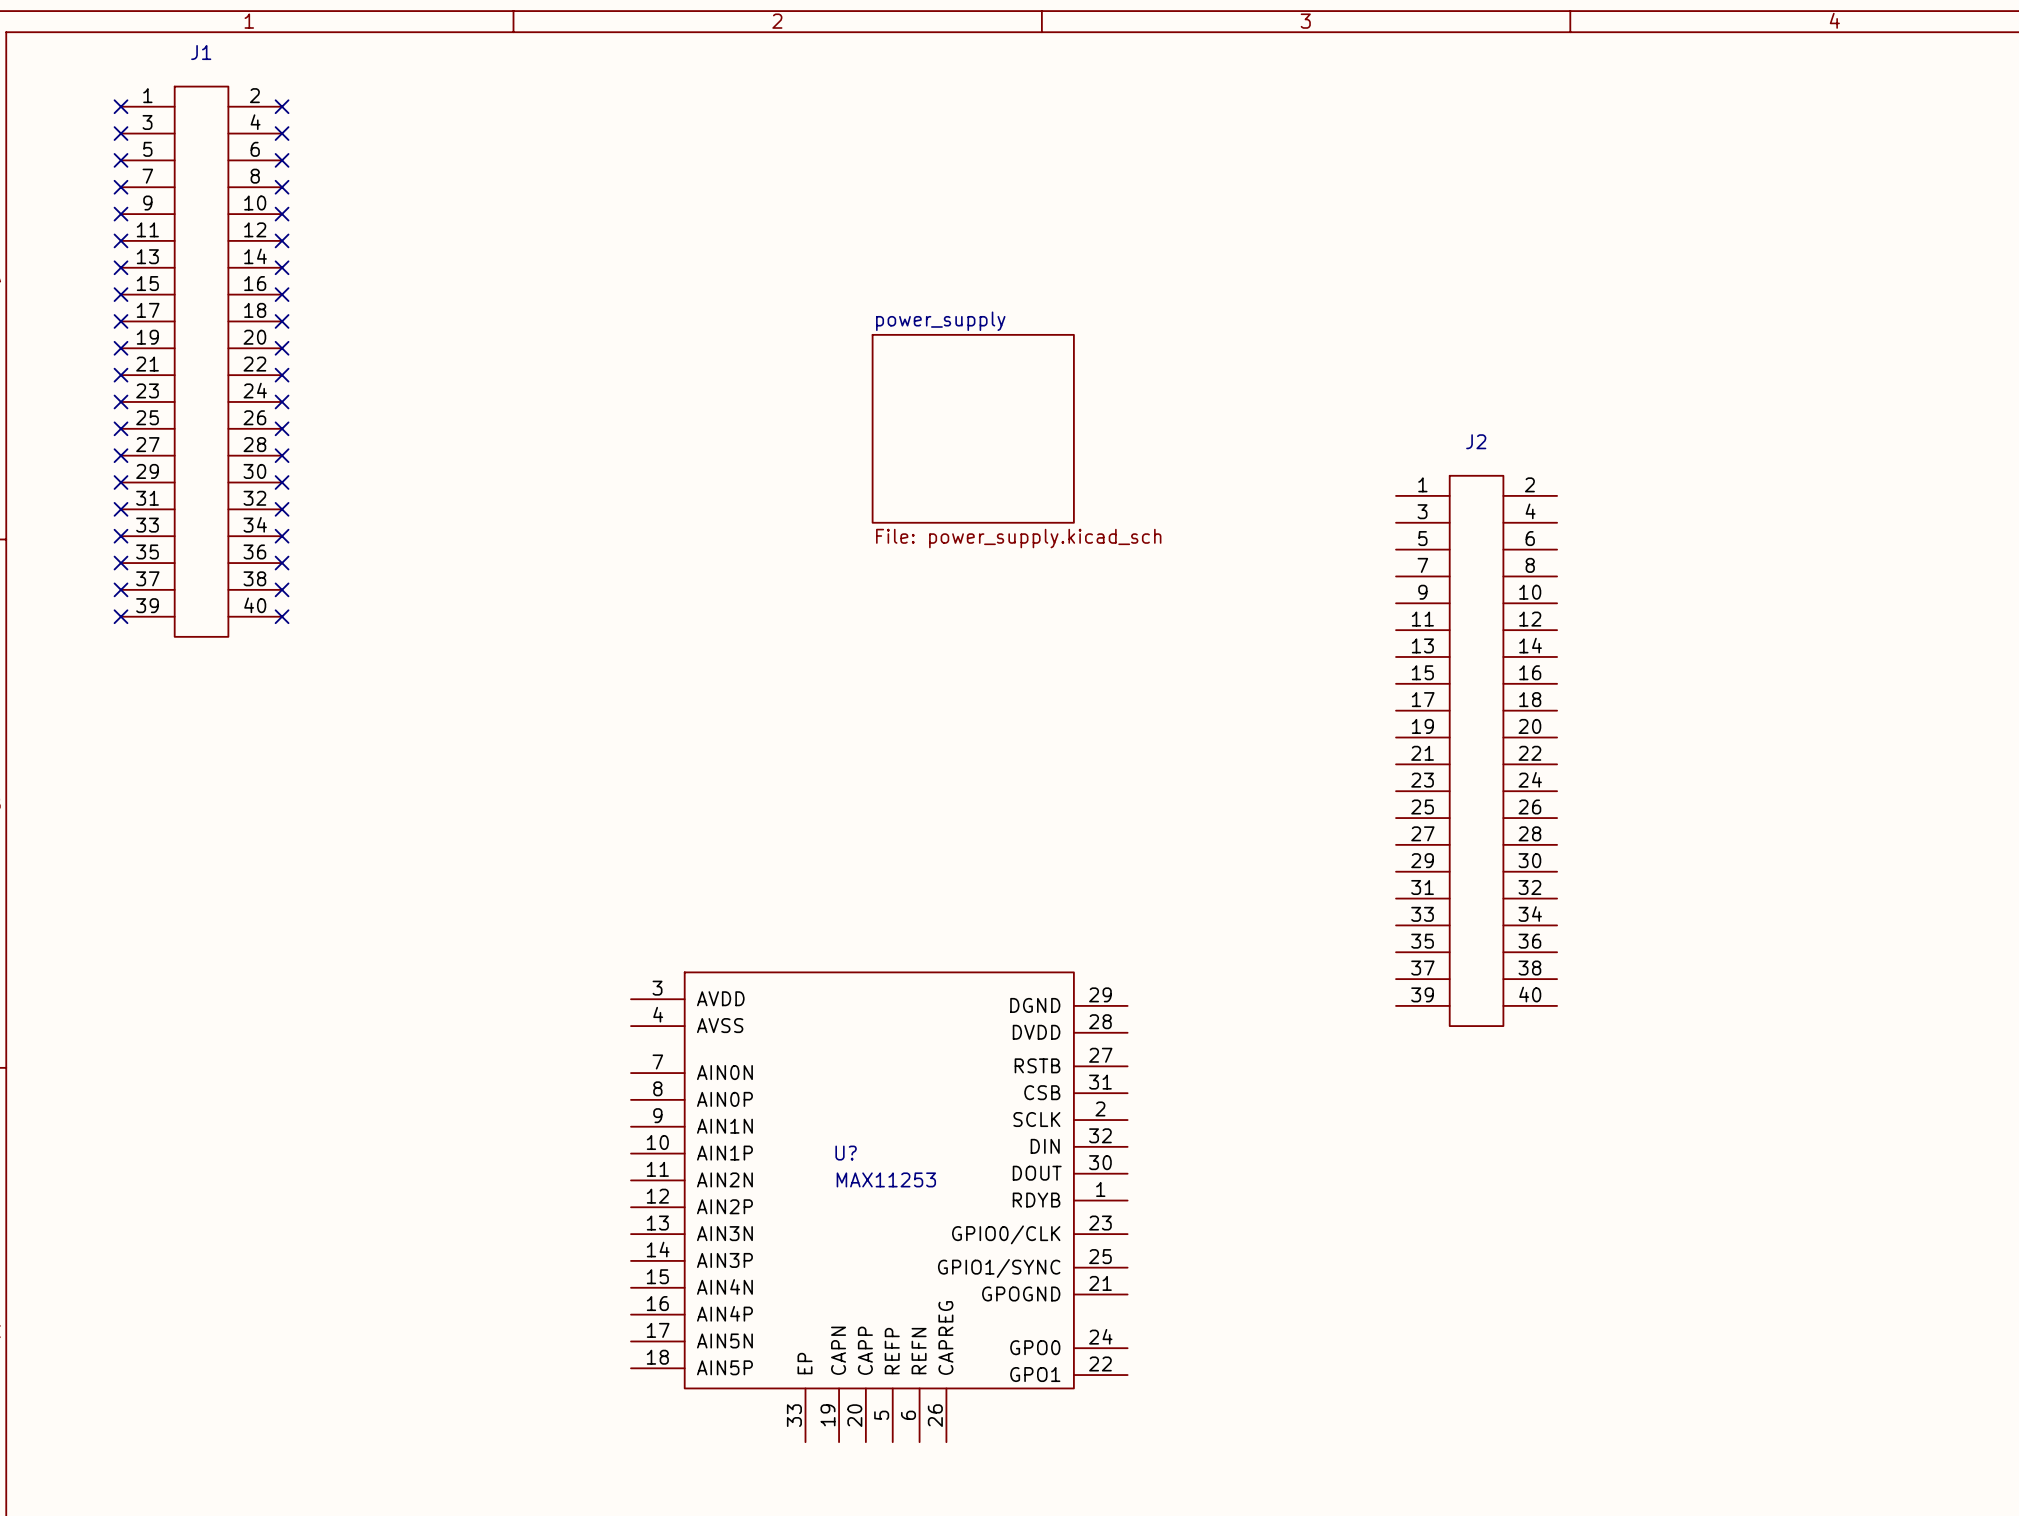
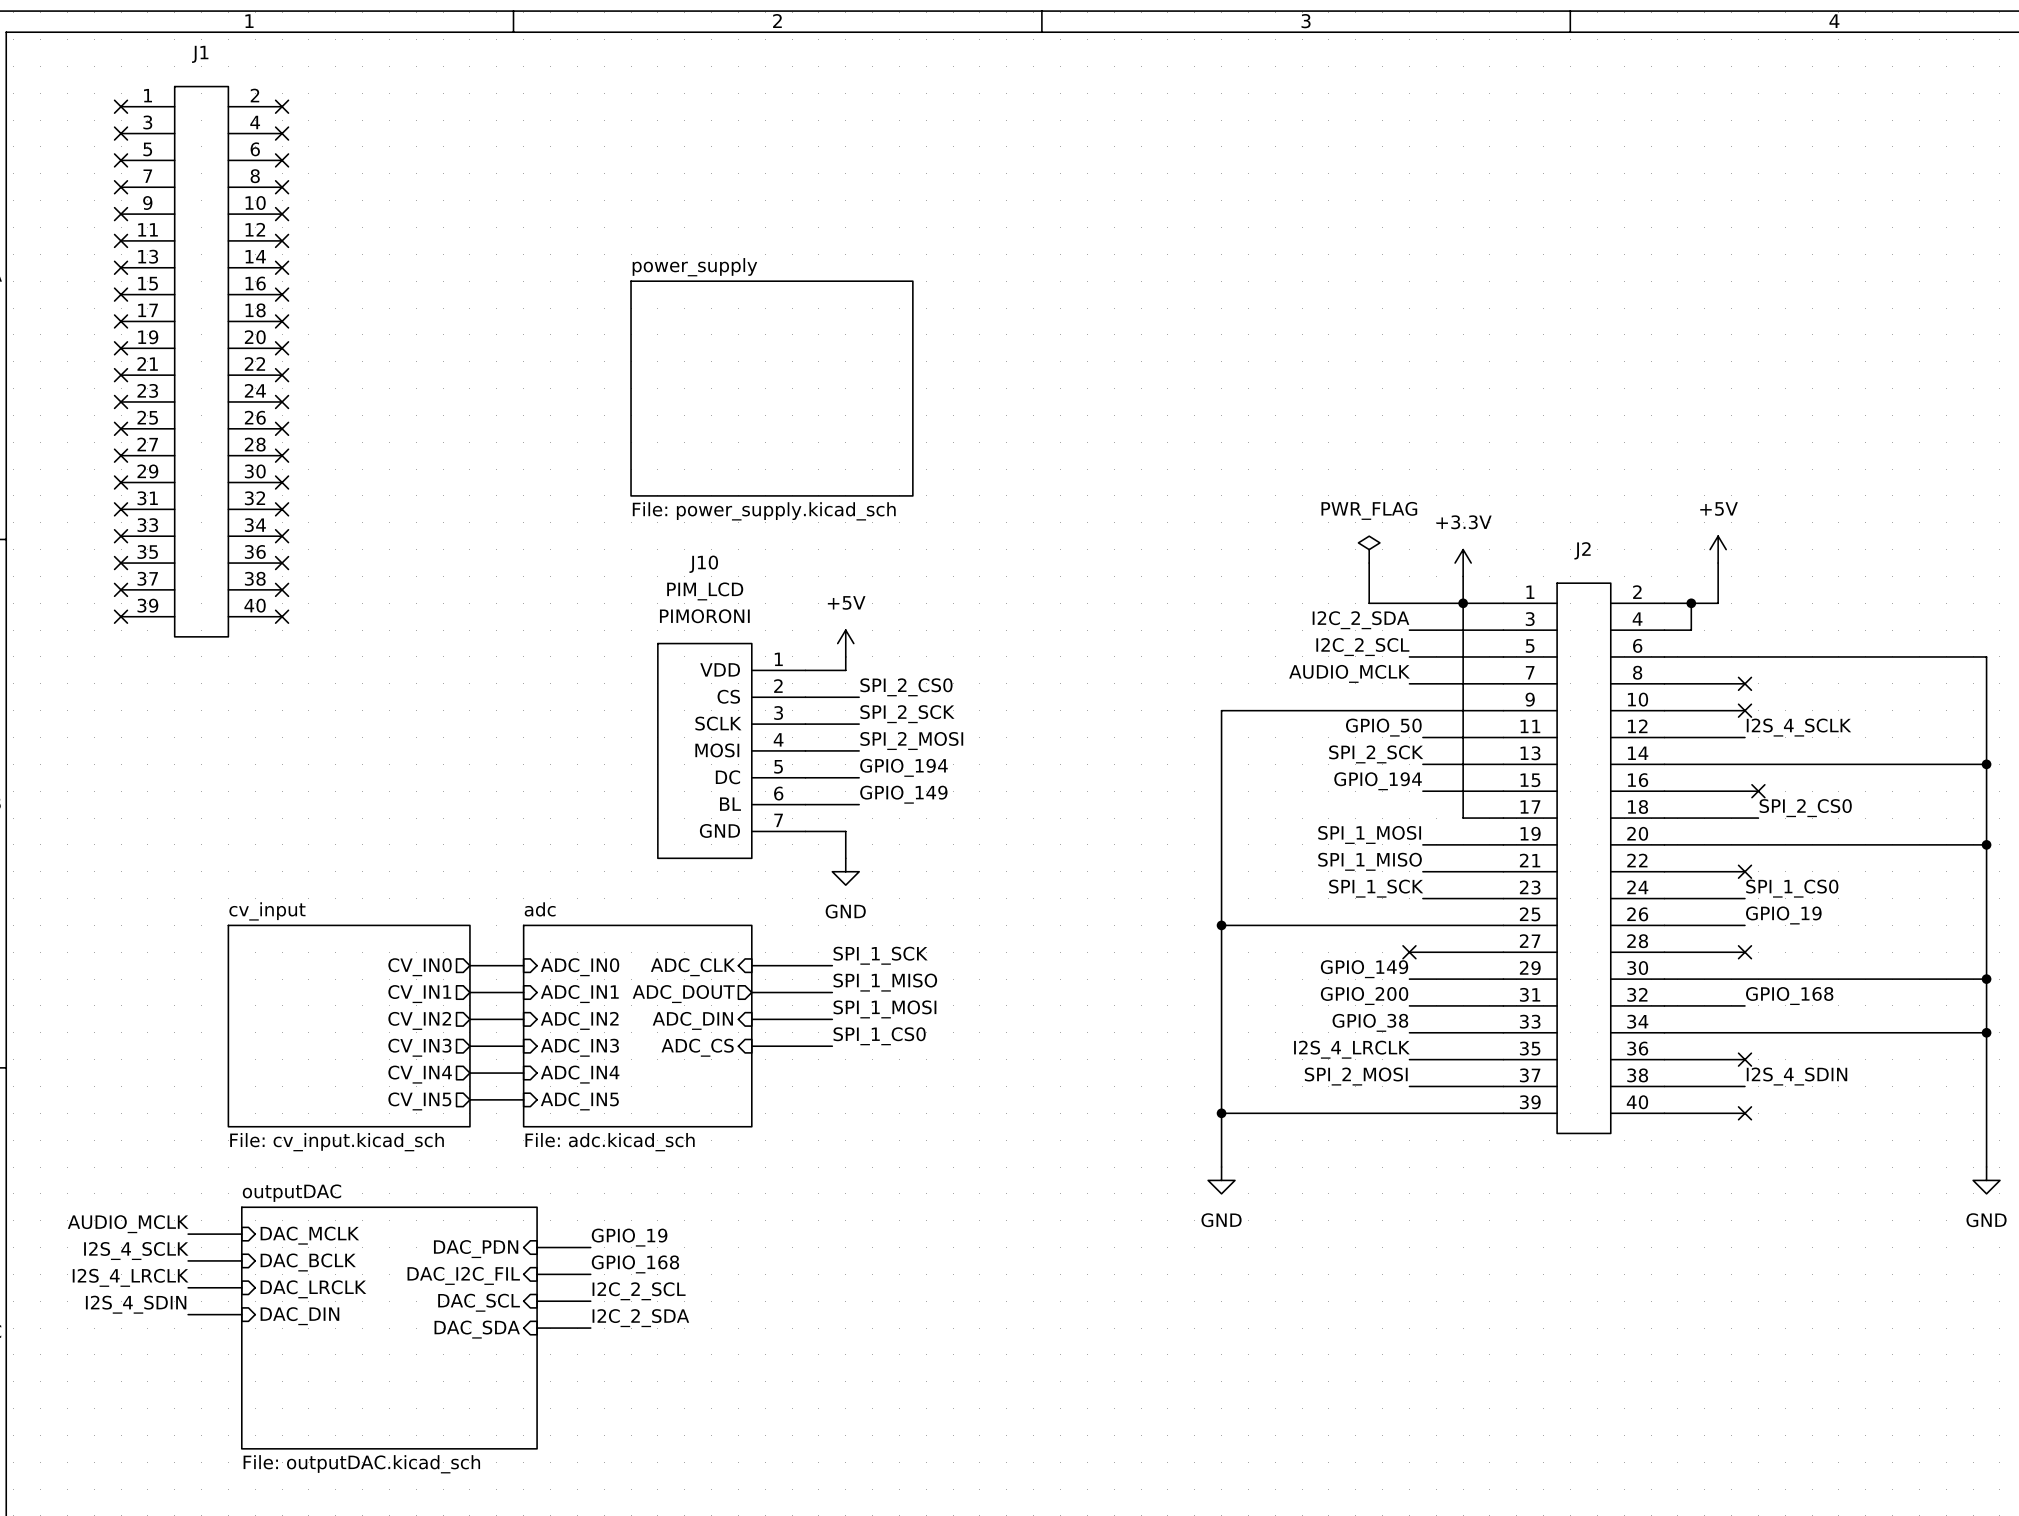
sheet power_supply: none -> File: power_supply.kicad_sch (771, 388)
sheet power_supply: File: power_supply.kicad_sch (973, 428) -> none
power symbol: none -> PWR_FLAG (1369, 549)
power symbol: none -> +5V (1718, 549)
wire: none -> (1369, 563) (1369, 603) (1503, 603)
power symbol: none -> +3.3V (1463, 563)
wire: none -> (1718, 563) (1718, 603) (1664, 603)
wire: none -> (1463, 576) (1463, 818) (1503, 818)
junction: none -> (1463, 603)
wire: none -> (1691, 603) (1691, 630) (1664, 630)
junction: none -> (1691, 603)
label: none -> I2C_2_SDA (1360, 620)
wire: none -> (1409, 630) (1503, 630)
power symbol: none -> +5V (845, 643)
label: none -> I2C_2_SCL (1362, 647)
wire: none -> (845, 656) (845, 670) (805, 670)
wire: none -> (1409, 656) (1503, 656)
wire: none -> (1664, 656) (1986, 656) (1986, 1167)
label: none -> AUDIO_MCLK (1349, 673)
wire: none -> (1409, 683) (1503, 683)
wire: none -> (1664, 683) (1744, 683)
no-connect mark: none -> (1744, 683)
label: none -> SPI_2_CS0 (906, 687)
wire: none -> (805, 697) (859, 697)
wire: none -> (1503, 710) (1221, 710) (1221, 1167)
wire: none -> (1664, 710) (1744, 710)
no-connect mark: none -> (1744, 710)
label: none -> SPI_2_SCK (907, 714)
wire: none -> (805, 724) (859, 724)
label: none -> I2S_4_SCLK (1798, 727)
label: none -> GPIO_50 (1383, 727)
wire: none -> (1422, 737) (1503, 737)
wire: none -> (1664, 737) (1744, 737)
label: none -> SPI_2_MOSI (911, 741)
J10: none -> PIM_LCD (731, 750)
wire: none -> (805, 750) (859, 750)
J2 position: (1476, 750) -> (1583, 858)
label: none -> SPI_2_SCK (1376, 754)
wire: none -> (1422, 764) (1503, 764)
wire: none -> (1664, 764) (1986, 764)
junction: none -> (1986, 764)
label: none -> GPIO_194 (903, 767)
wire: none -> (805, 777) (859, 777)
label: none -> GPIO_194 (1378, 781)
wire: none -> (1422, 791) (1503, 791)
wire: none -> (1664, 791) (1758, 791)
no-connect mark: none -> (1758, 791)
label: none -> GPIO_149 (903, 794)
wire: none -> (805, 804) (859, 804)
label: none -> SPI_2_CS0 (1805, 808)
wire: none -> (1664, 818) (1758, 818)
wire: none -> (805, 831) (845, 831) (845, 858)
label: none -> SPI_1_MOSI (1369, 834)
wire: none -> (1422, 844) (1503, 844)
wire: none -> (1664, 844) (1986, 844)
junction: none -> (1986, 844)
label: none -> SPI_1_MISO (1370, 861)
power symbol: none -> GND (845, 871)
wire: none -> (1422, 871) (1503, 871)
wire: none -> (1664, 871) (1744, 871)
no-connect mark: none -> (1744, 871)
label: none -> SPI_1_SCK (1376, 888)
label: none -> SPI_1_CS0 (1792, 888)
wire: none -> (1422, 898) (1503, 898)
wire: none -> (1664, 898) (1744, 898)
label: none -> GPIO_19 (1783, 915)
wire: none -> (1221, 925) (1503, 925)
junction: none -> (1221, 925)
wire: none -> (1664, 925) (1744, 925)
wire: none -> (1409, 952) (1503, 952)
no-connect mark: none -> (1409, 952)
wire: none -> (1664, 952) (1744, 952)
no-connect mark: none -> (1744, 952)
label: none -> SPI_1_SCK (880, 955)
sheet pin: none -> CV_IN0 (420, 967)
wire: none -> (469, 965) (523, 965)
sheet pin: none -> ADC_IN0 (580, 967)
sheet pin: none -> ADC_CLK (693, 967)
wire: none -> (751, 965) (832, 965)
label: none -> GPIO_149 (1364, 969)
wire: none -> (1409, 979) (1503, 979)
wire: none -> (1664, 979) (1986, 979)
junction: none -> (1986, 979)
label: none -> SPI_1_MISO (885, 982)
sheet pin: none -> CV_IN1 (419, 994)
wire: none -> (469, 992) (523, 992)
sheet pin: none -> ADC_IN1 (579, 994)
sheet pin: none -> ADC_DOUT (683, 994)
wire: none -> (751, 992) (832, 992)
label: none -> GPIO_200 (1364, 996)
label: none -> GPIO_168 (1789, 996)
wire: none -> (1409, 1005) (1503, 1005)
wire: none -> (1664, 1005) (1744, 1005)
label: none -> SPI_1_MOSI (884, 1009)
sheet pin: none -> CV_IN2 (419, 1020)
wire: none -> (469, 1019) (523, 1019)
sheet pin: none -> ADC_IN2 (579, 1020)
sheet pin: none -> ADC_DIN (692, 1020)
wire: none -> (751, 1019) (832, 1019)
label: none -> GPIO_38 (1370, 1022)
sheet cv_input: none -> File: cv_input.kicad_sch (349, 1026)
sheet adc: none -> File: adc.kicad_sch (637, 1026)
wire: none -> (1409, 1032) (1503, 1032)
wire: none -> (1664, 1032) (1986, 1032)
junction: none -> (1986, 1032)
label: none -> SPI_1_CS0 (879, 1036)
sheet pin: none -> CV_IN3 (419, 1047)
wire: none -> (469, 1046) (523, 1046)
sheet pin: none -> ADC_IN3 (579, 1047)
sheet pin: none -> ADC_CS (697, 1047)
wire: none -> (751, 1046) (832, 1046)
label: none -> I2S_4_LRCLK (1351, 1049)
wire: none -> (1409, 1059) (1503, 1059)
wire: none -> (1664, 1059) (1744, 1059)
no-connect mark: none -> (1744, 1059)
sheet pin: none -> CV_IN4 (420, 1074)
sheet pin: none -> ADC_IN4 (580, 1074)
wire: none -> (469, 1073) (523, 1073)
label: none -> I2S_4_SDIN (1796, 1076)
label: none -> SPI_2_MOSI (1356, 1076)
wire: none -> (1409, 1086) (1503, 1086)
wire: none -> (1664, 1086) (1744, 1086)
wire: none -> (469, 1099) (523, 1099)
sheet pin: none -> CV_IN5 (419, 1101)
sheet pin: none -> ADC_IN5 (579, 1101)
wire: none -> (1221, 1113) (1503, 1113)
junction: none -> (1221, 1113)
wire: none -> (1664, 1113) (1744, 1113)
no-connect mark: none -> (1744, 1113)
power symbol: none -> GND (1221, 1180)
power symbol: none -> GND (1986, 1180)
U?: MAX11253 (879, 1207) -> none
label: none -> AUDIO_MCLK (128, 1224)
wire: none -> (188, 1234) (241, 1234)
sheet pin: none -> DAC_MCLK (309, 1235)
label: none -> GPIO_19 (629, 1237)
sheet pin: none -> DAC_PDN (476, 1249)
wire: none -> (537, 1247) (590, 1247)
label: none -> I2S_4_SCLK (136, 1251)
wire: none -> (188, 1260) (241, 1260)
sheet pin: none -> DAC_BCLK (308, 1262)
label: none -> GPIO_168 (635, 1264)
sheet pin: none -> DAC_I2C_FIL (463, 1275)
wire: none -> (537, 1274) (590, 1274)
label: none -> I2S_4_LRCLK (130, 1277)
wire: none -> (188, 1287) (241, 1287)
sheet pin: none -> DAC_LRCLK (313, 1289)
label: none -> I2C_2_SCL (639, 1291)
sheet pin: none -> DAC_SCL (479, 1302)
wire: none -> (537, 1301) (590, 1301)
label: none -> I2S_4_SDIN (136, 1304)
wire: none -> (188, 1314) (241, 1314)
sheet pin: none -> DAC_DIN (299, 1316)
label: none -> I2C_2_SDA (640, 1318)
sheet outputDAC: none -> File: outputDAC.kicad_sch (389, 1328)
sheet pin: none -> DAC_SDA (477, 1329)
wire: none -> (537, 1328) (590, 1328)

